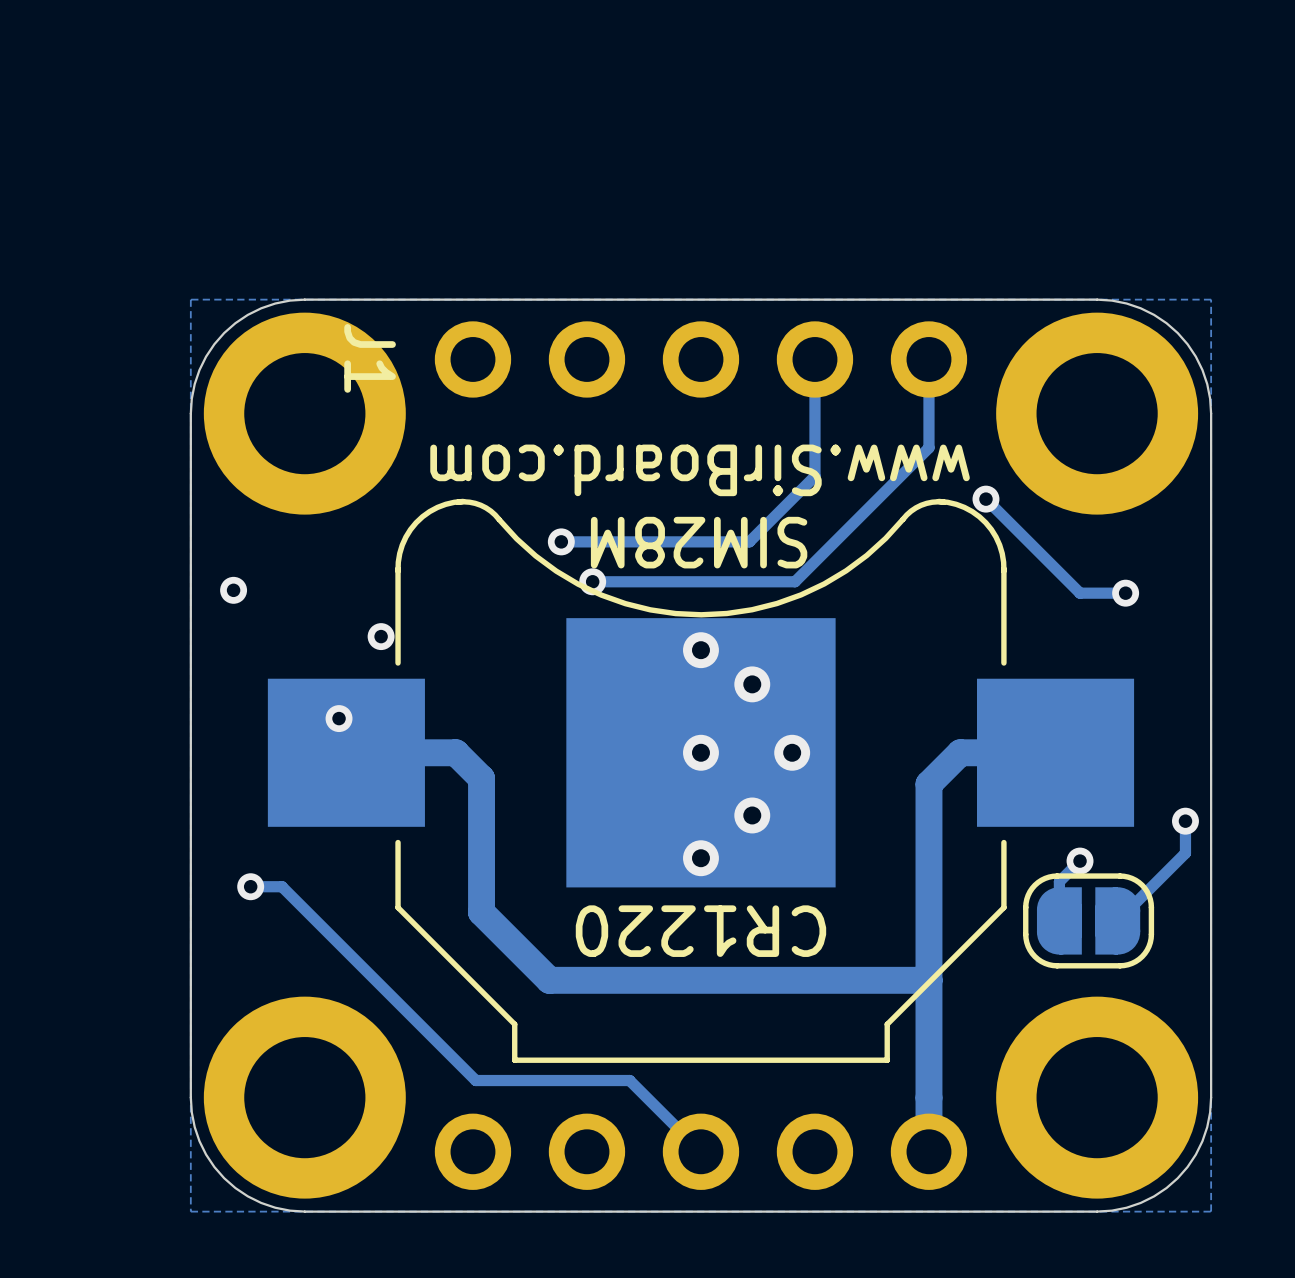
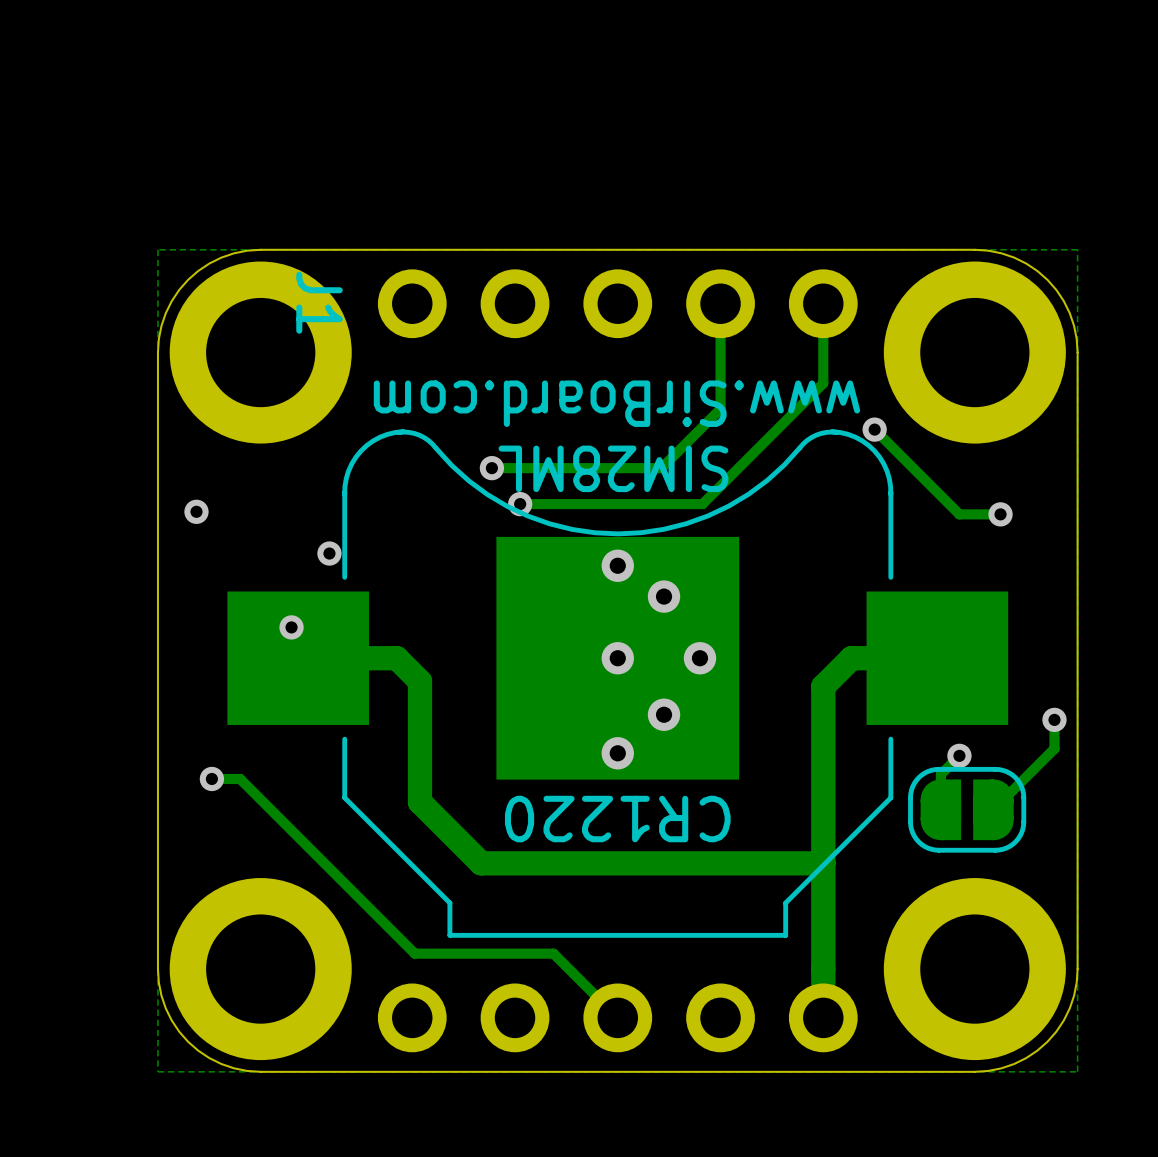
text: SIM28M (699, 542) -> SIM28ML (613, 468)

